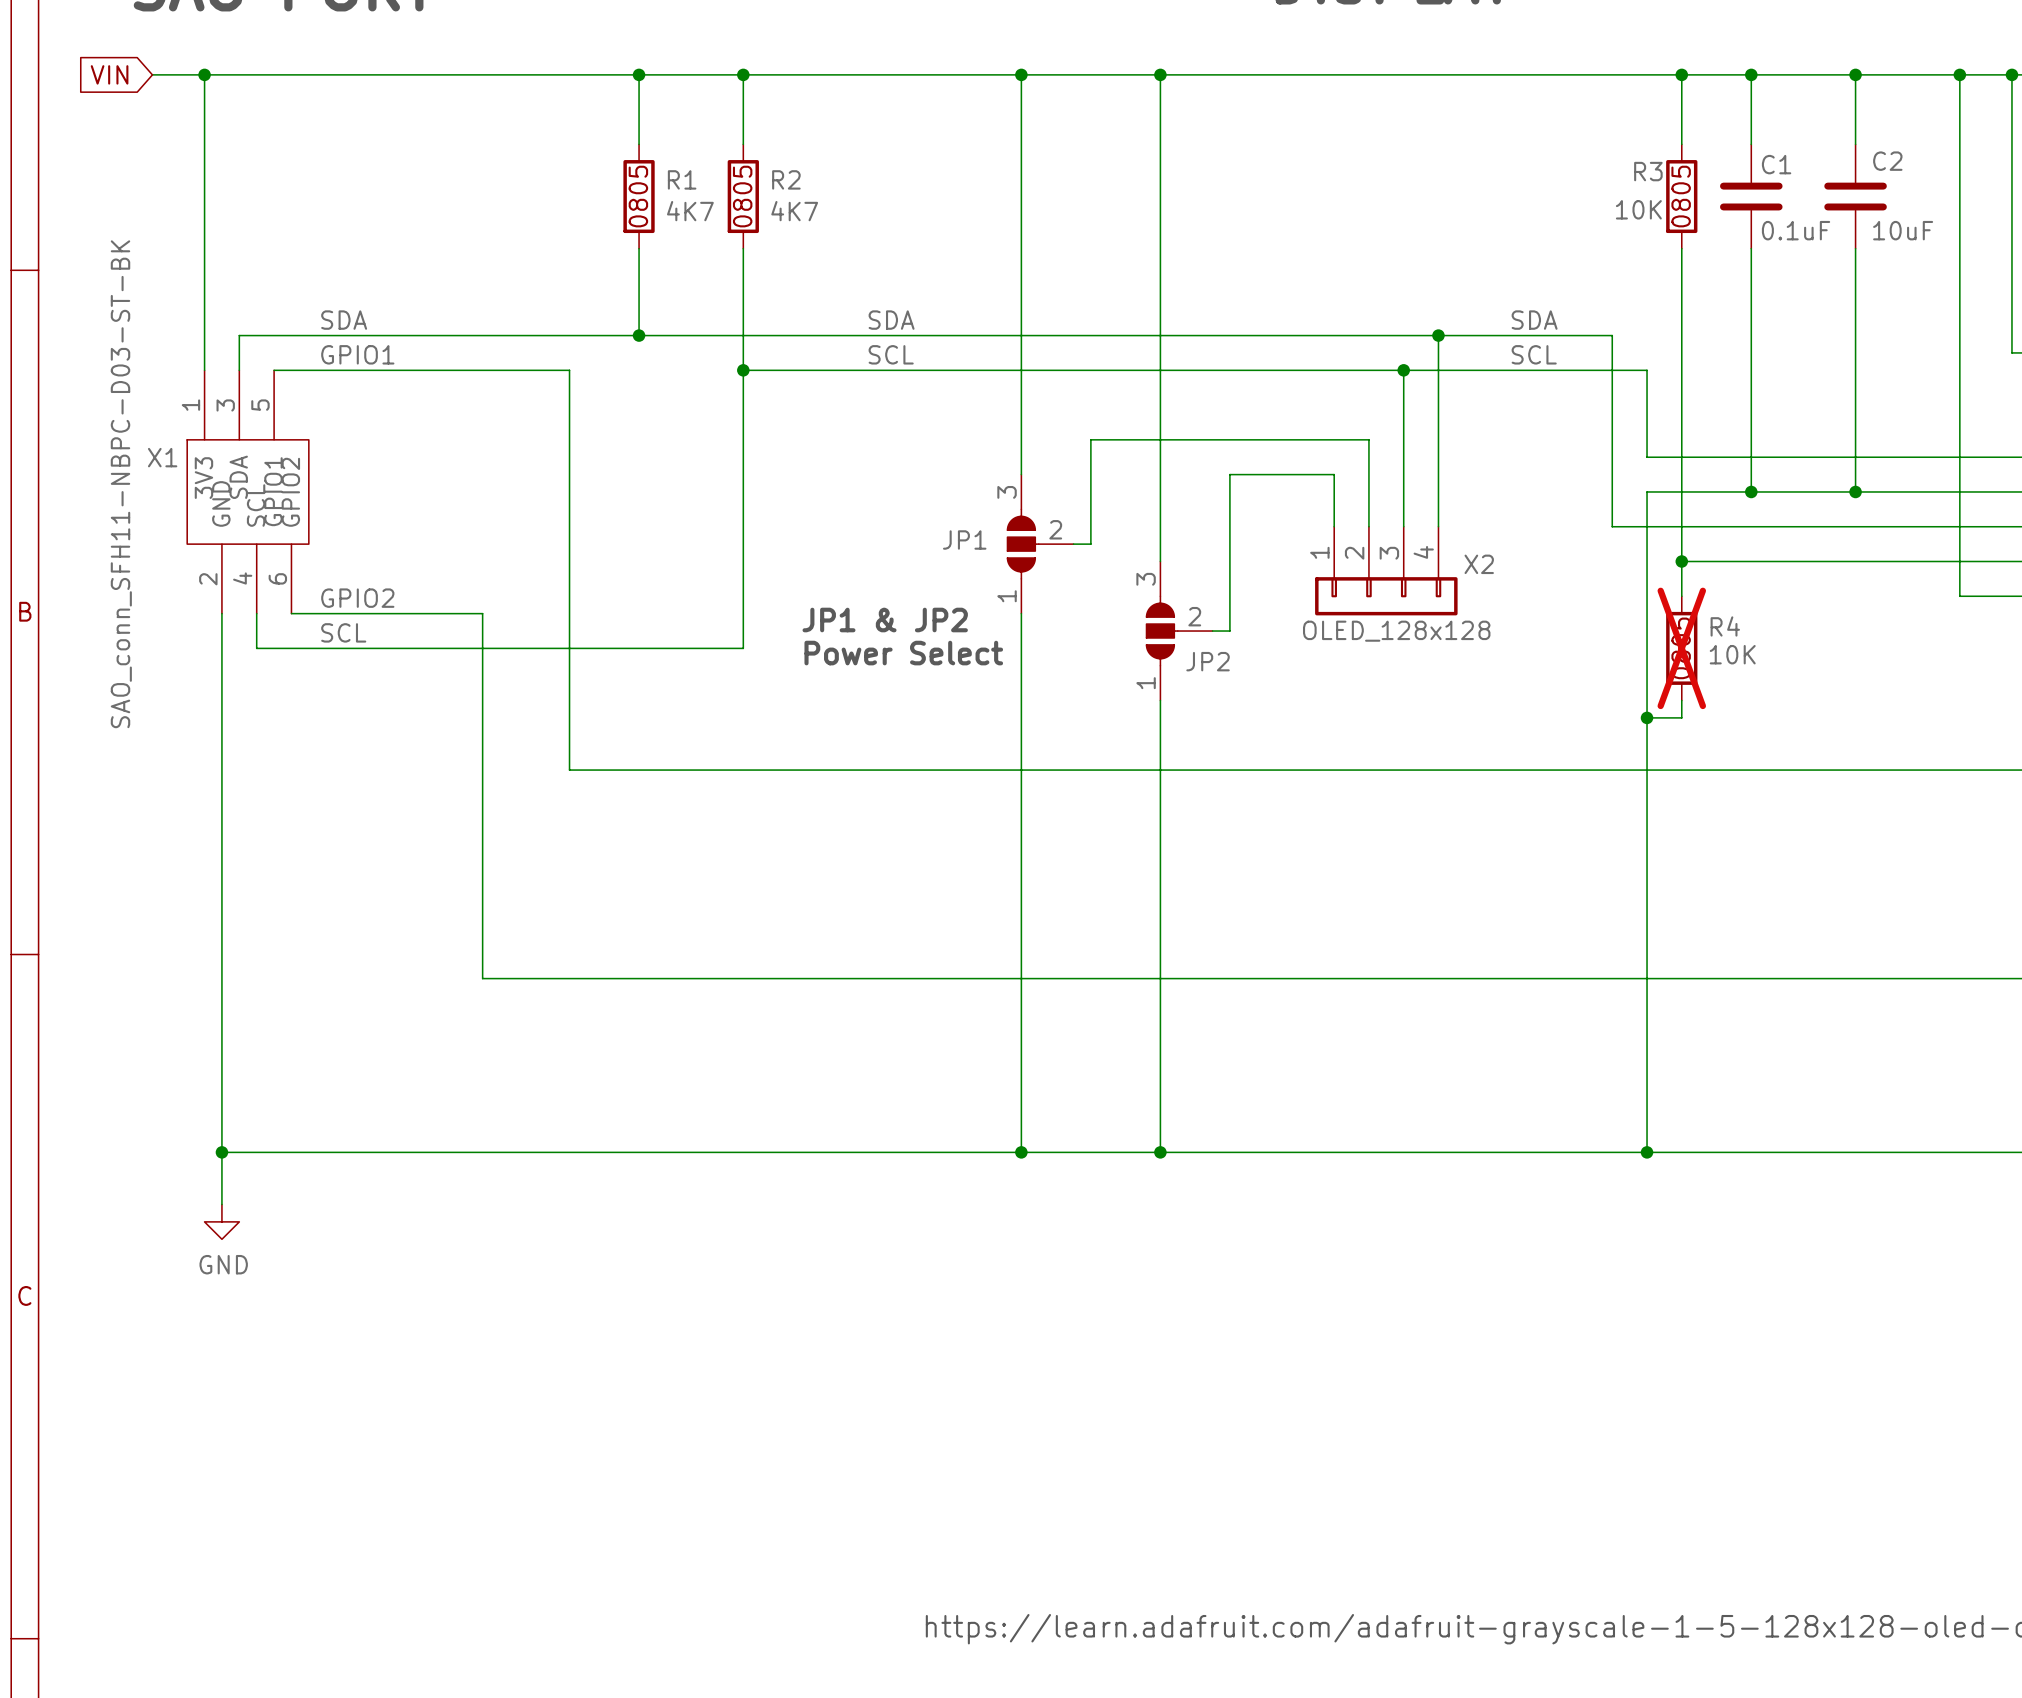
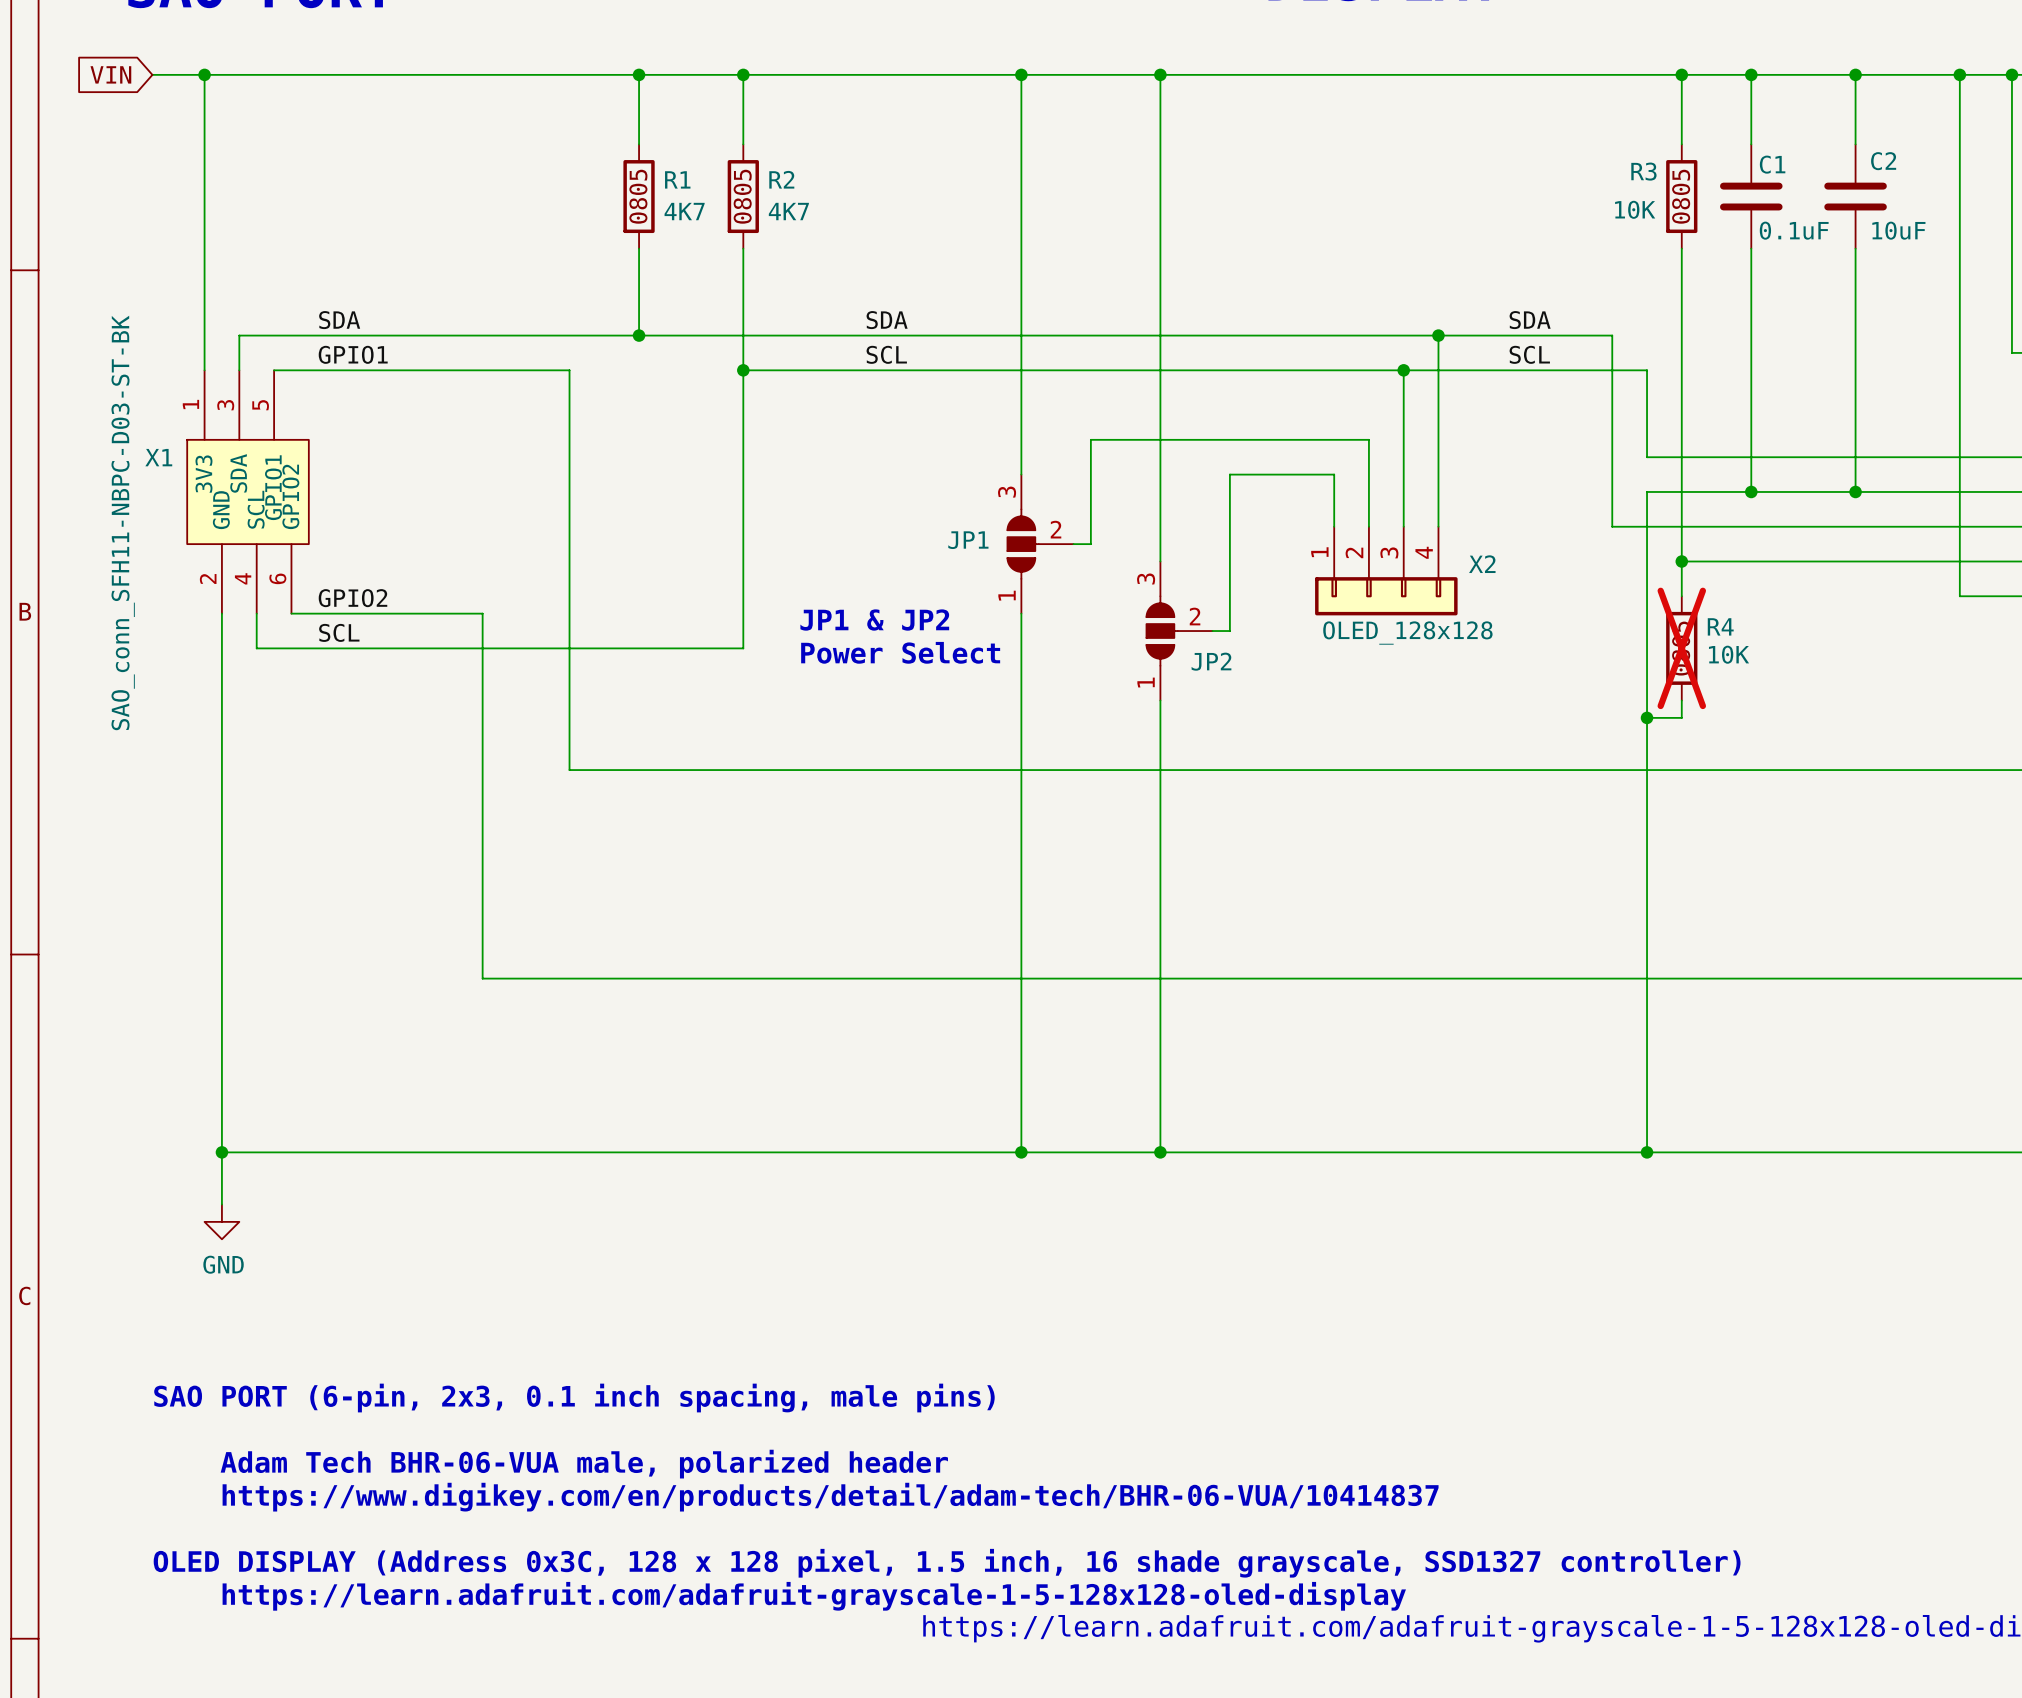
text: none -> SAO PORT (6-pin, 2x3, 0.1 inch spacing, male pins) (574, 1398)
text: none -> Adam Tech BHR-06-VUA male, polarized header (584, 1464)
text: none -> https://www.digikey.com/en/products/detail/adam-tech/BHR-06-VUA/10414837 (830, 1497)
text: none -> OLED DISPLAY (Address 0x3C, 128 x 128 pixel, 1.5 inch, 16 shade grayscale, SSD1327 controller) (947, 1563)
text: none -> https://learn.adafruit.com/adafruit-grayscale-1-5-128x128-oled-display (814, 1596)

